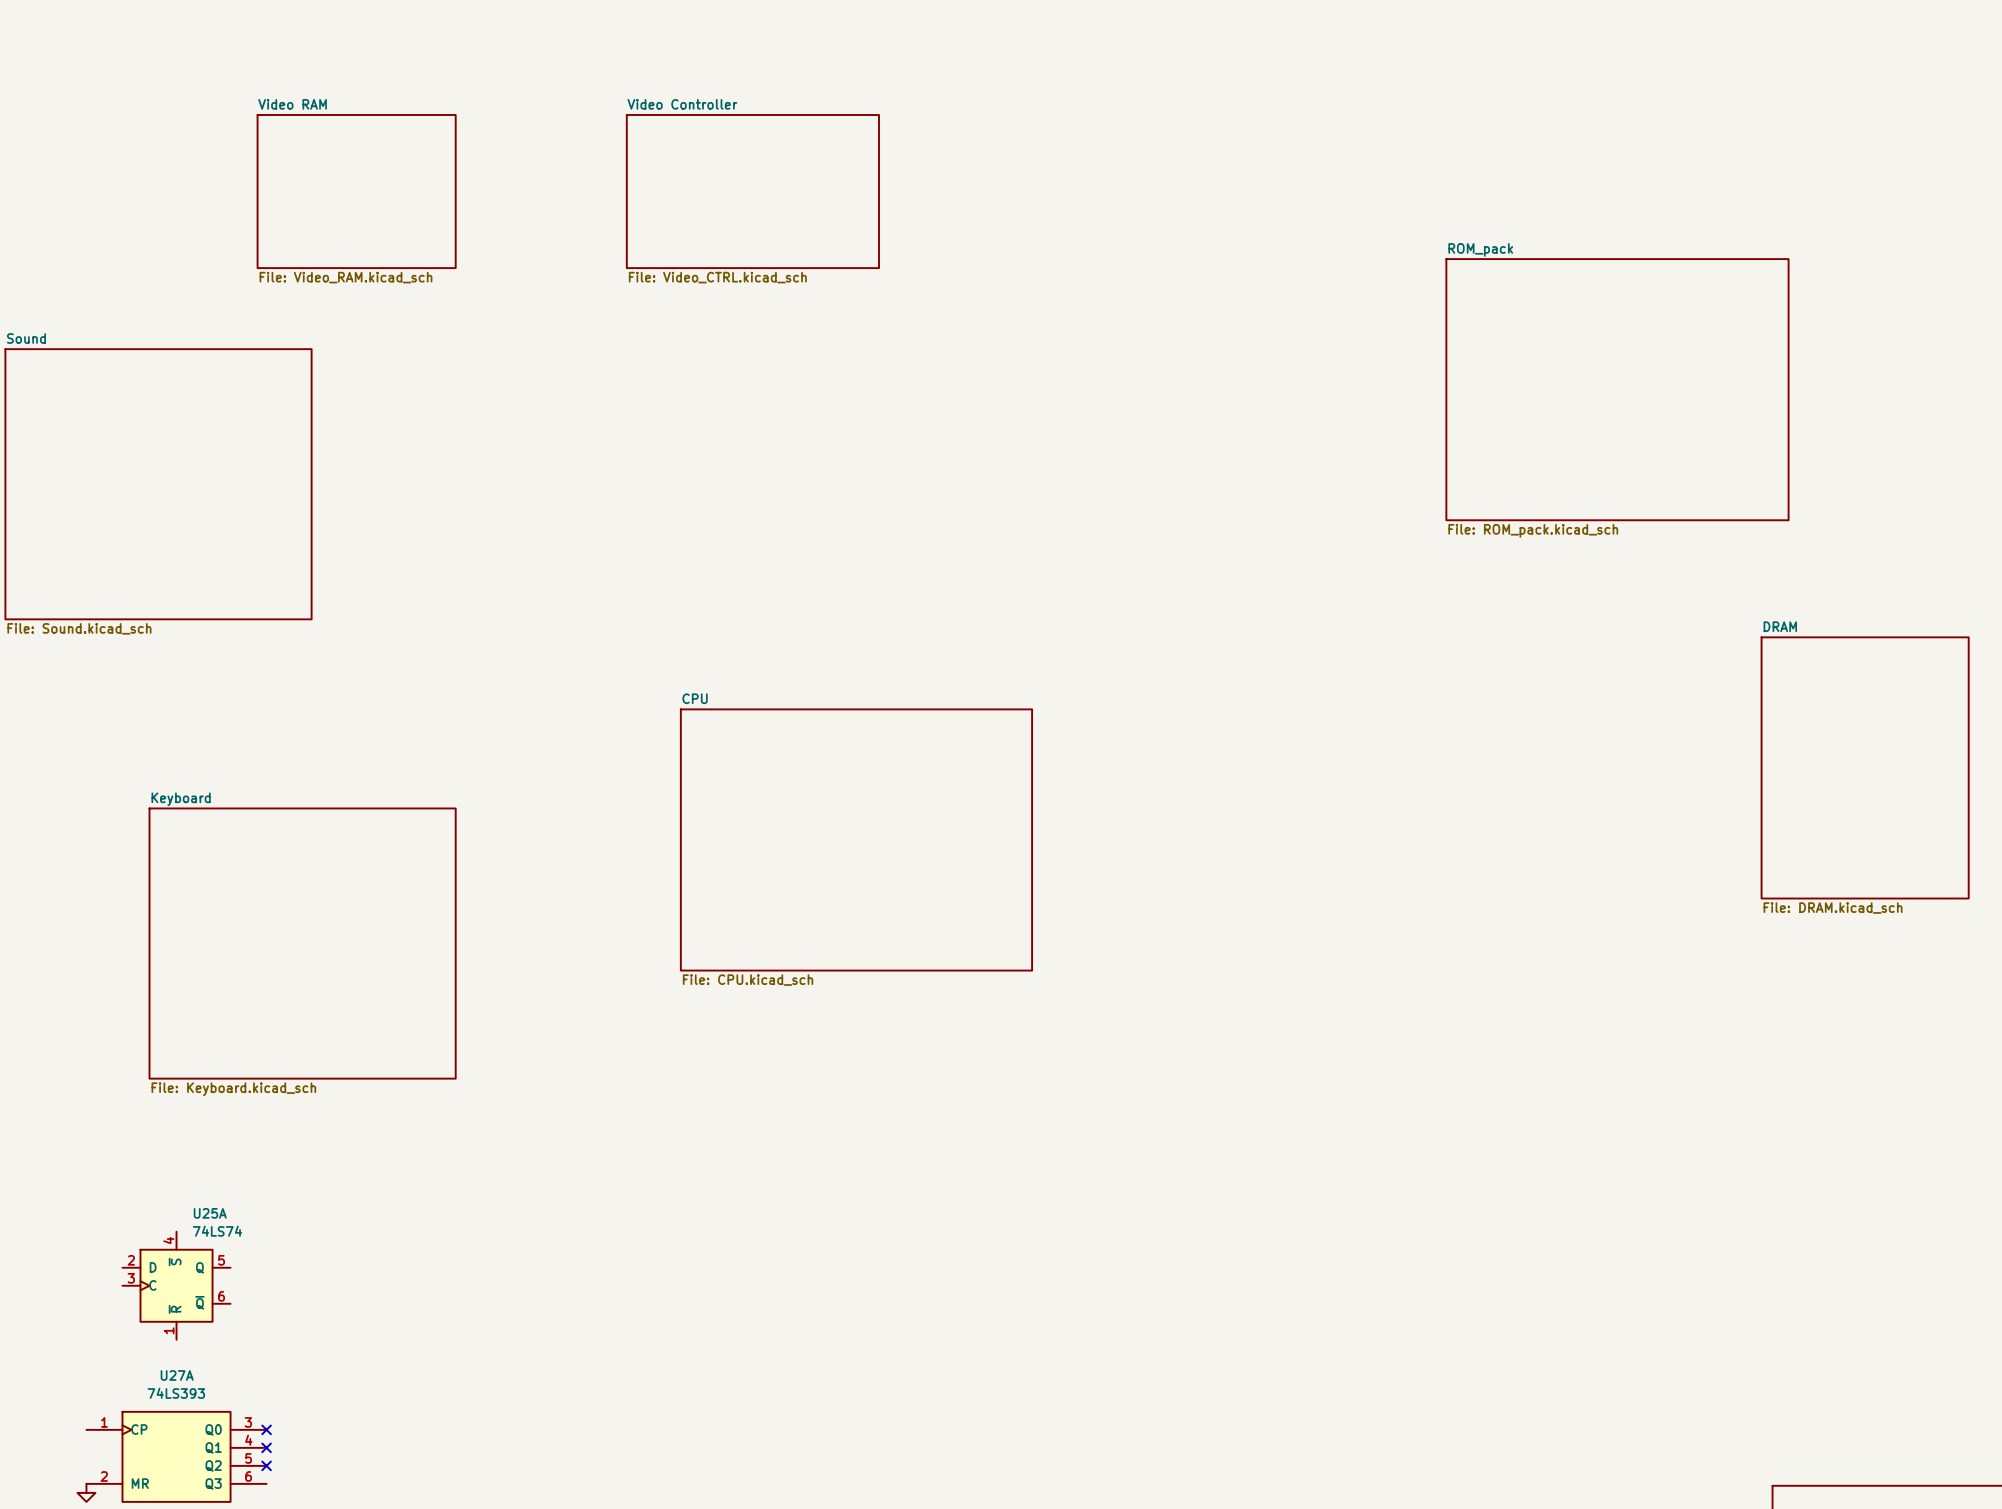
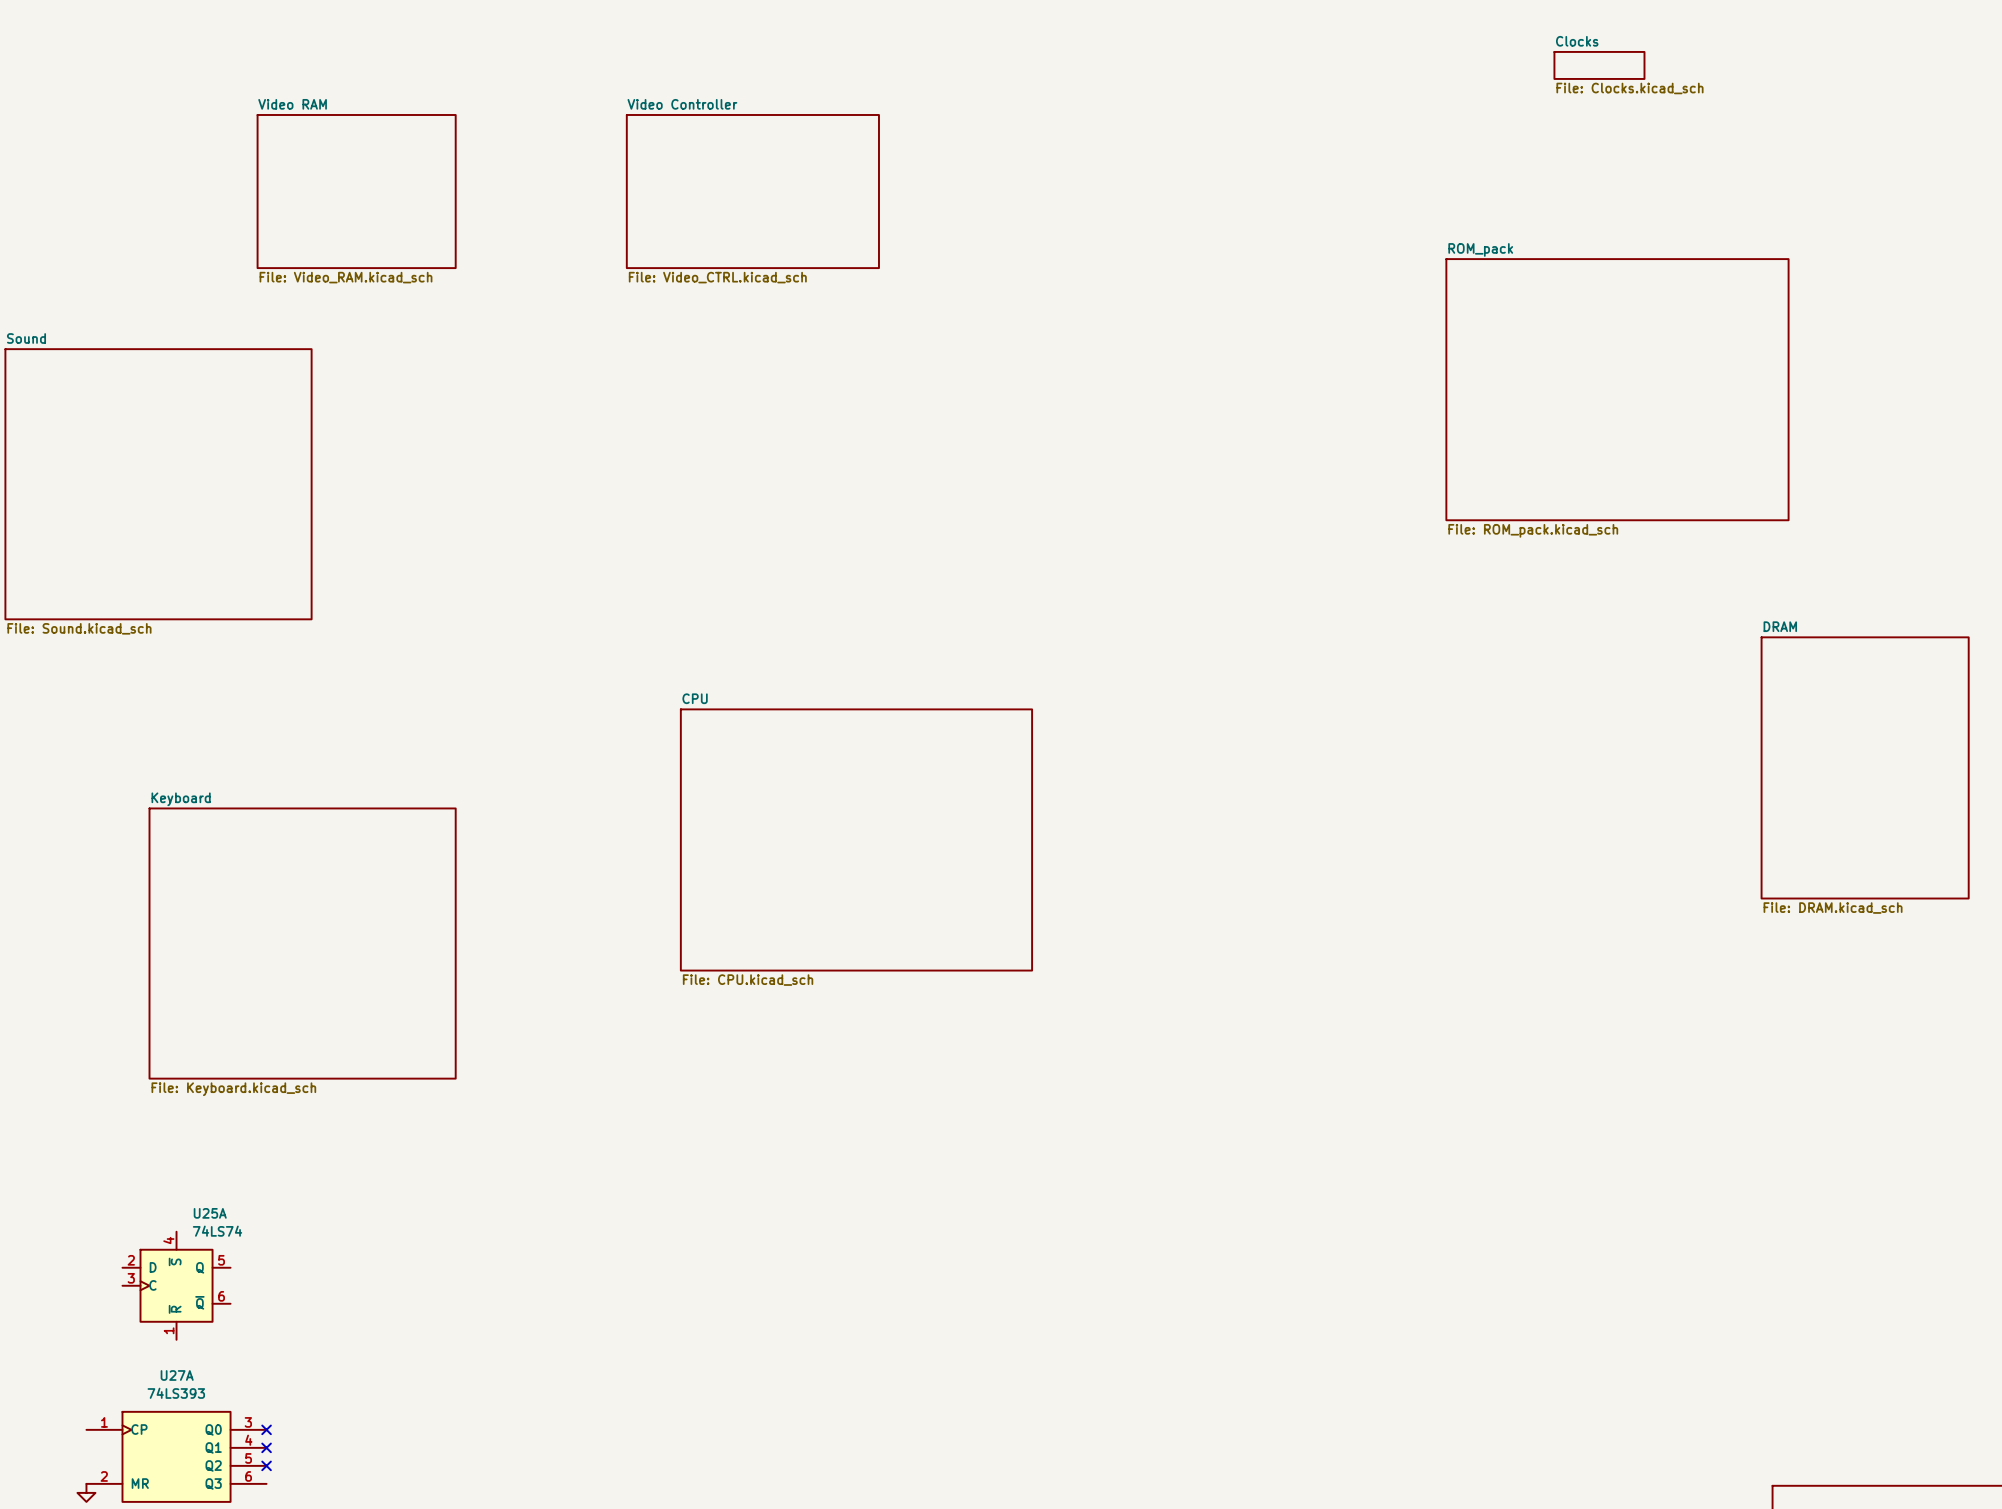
sheet Clocks: none -> File: Clocks.kicad_sch (1599, 65)

